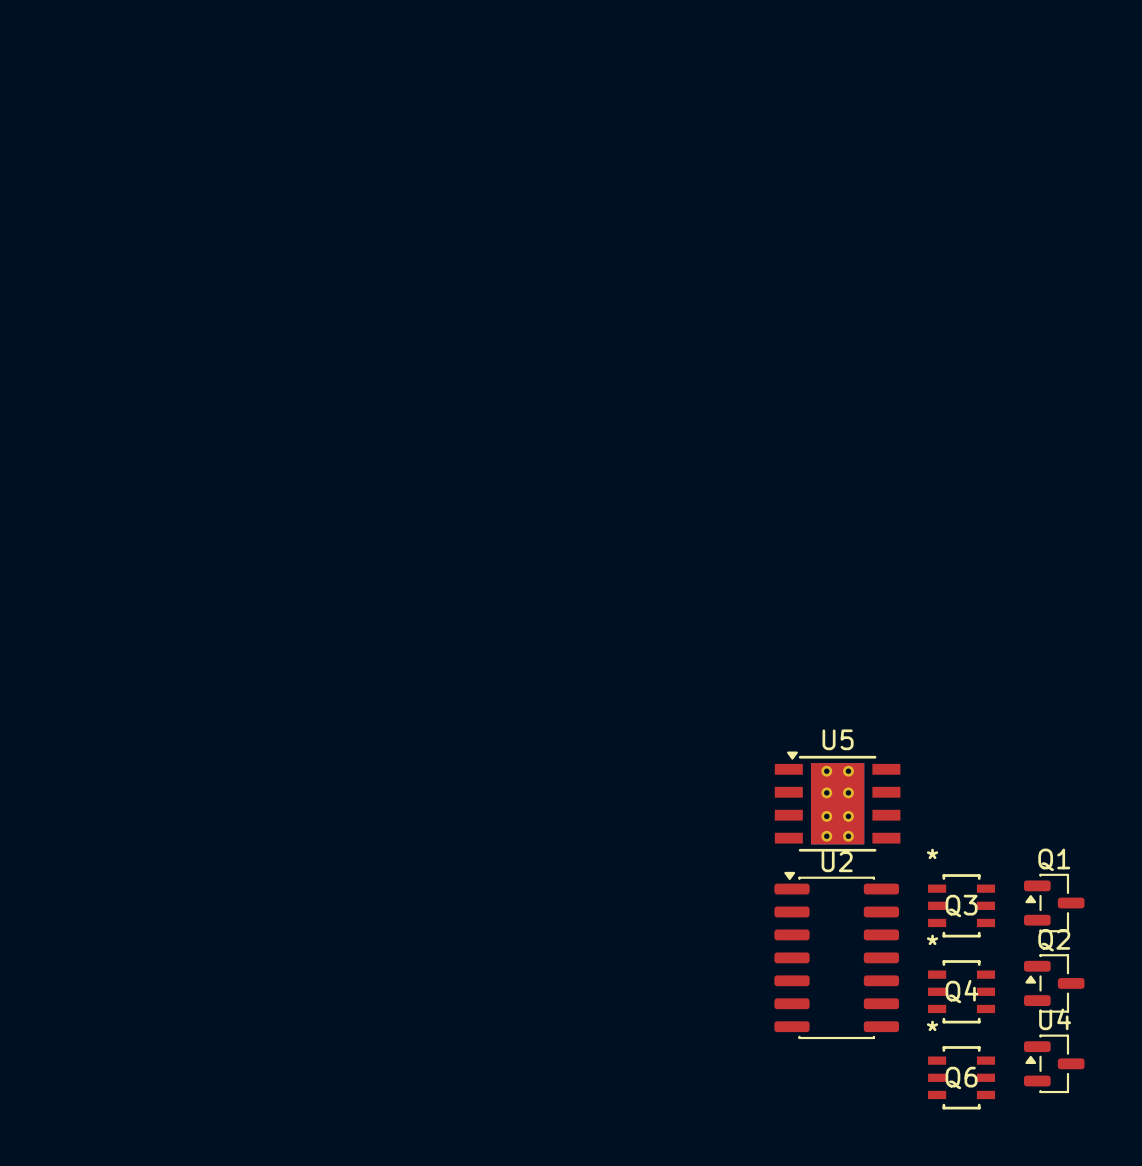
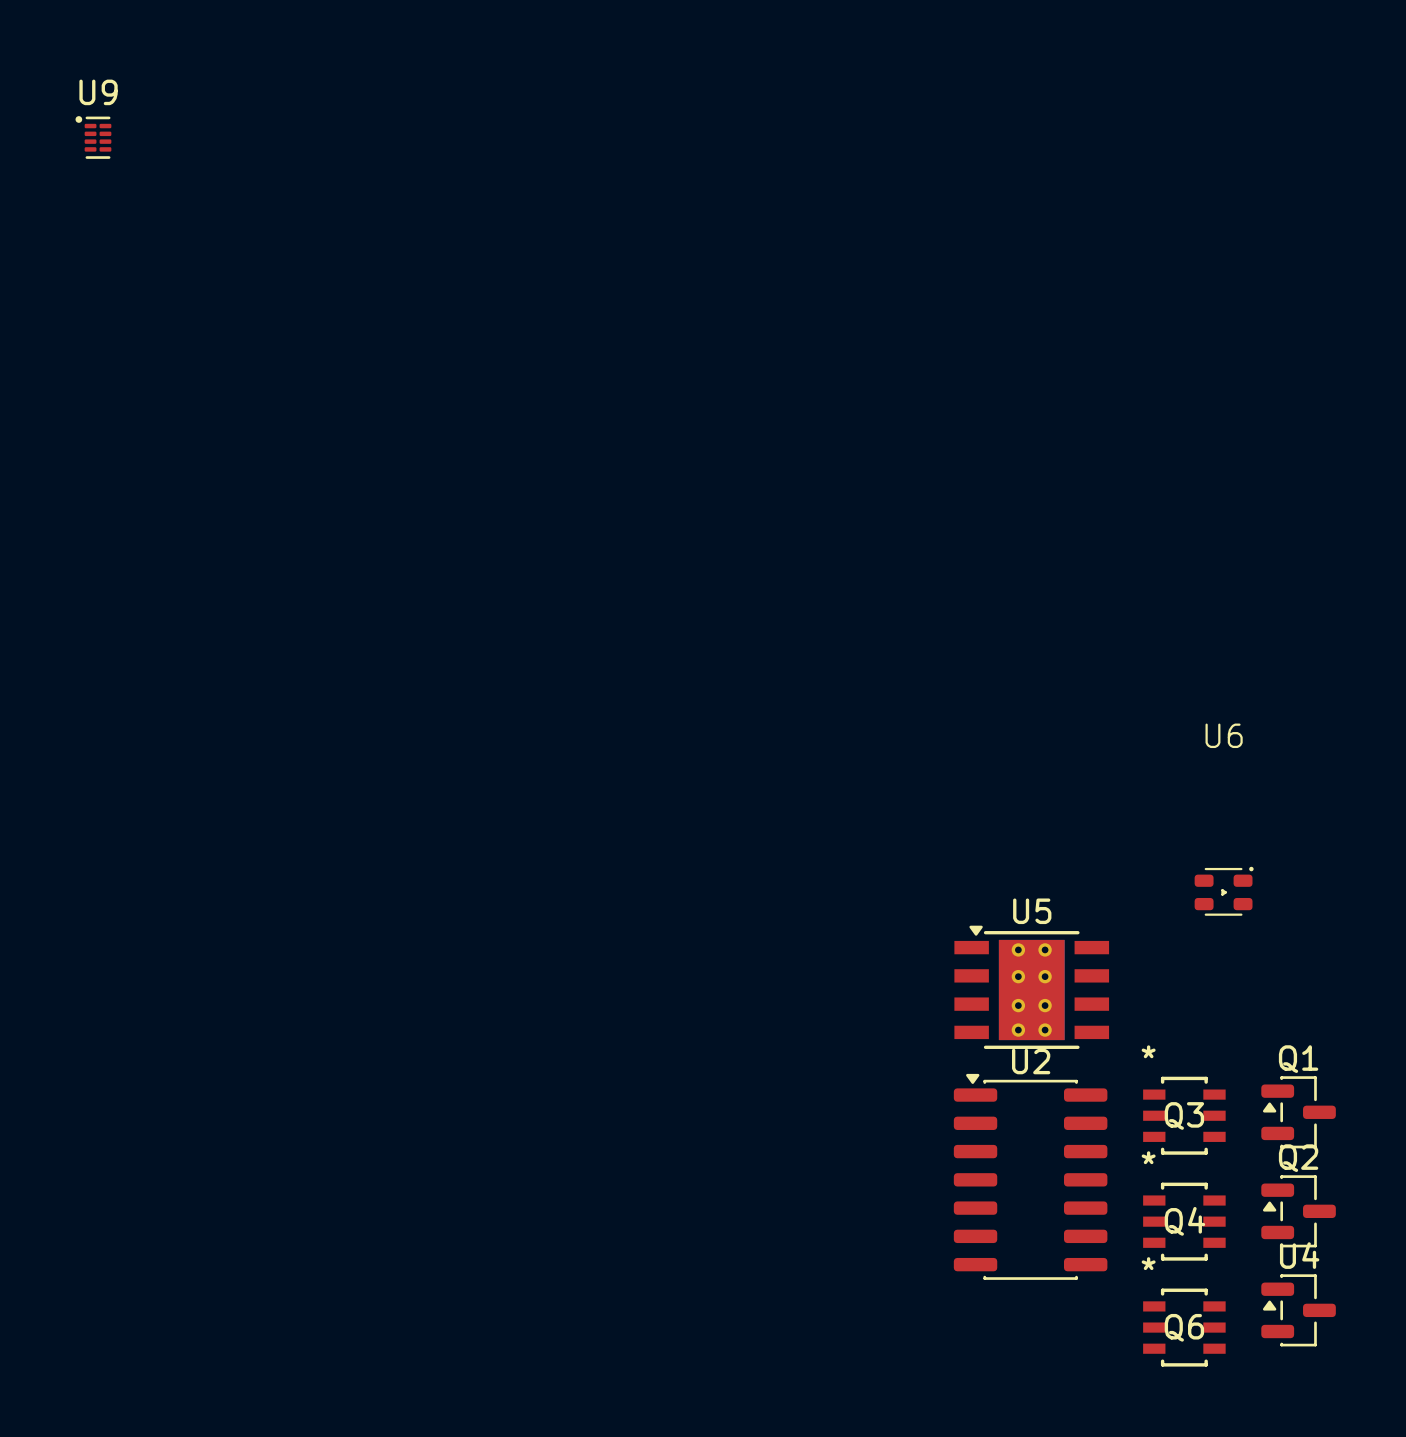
U9: none -> (93, 137)
U6: none -> (1224, 891)

